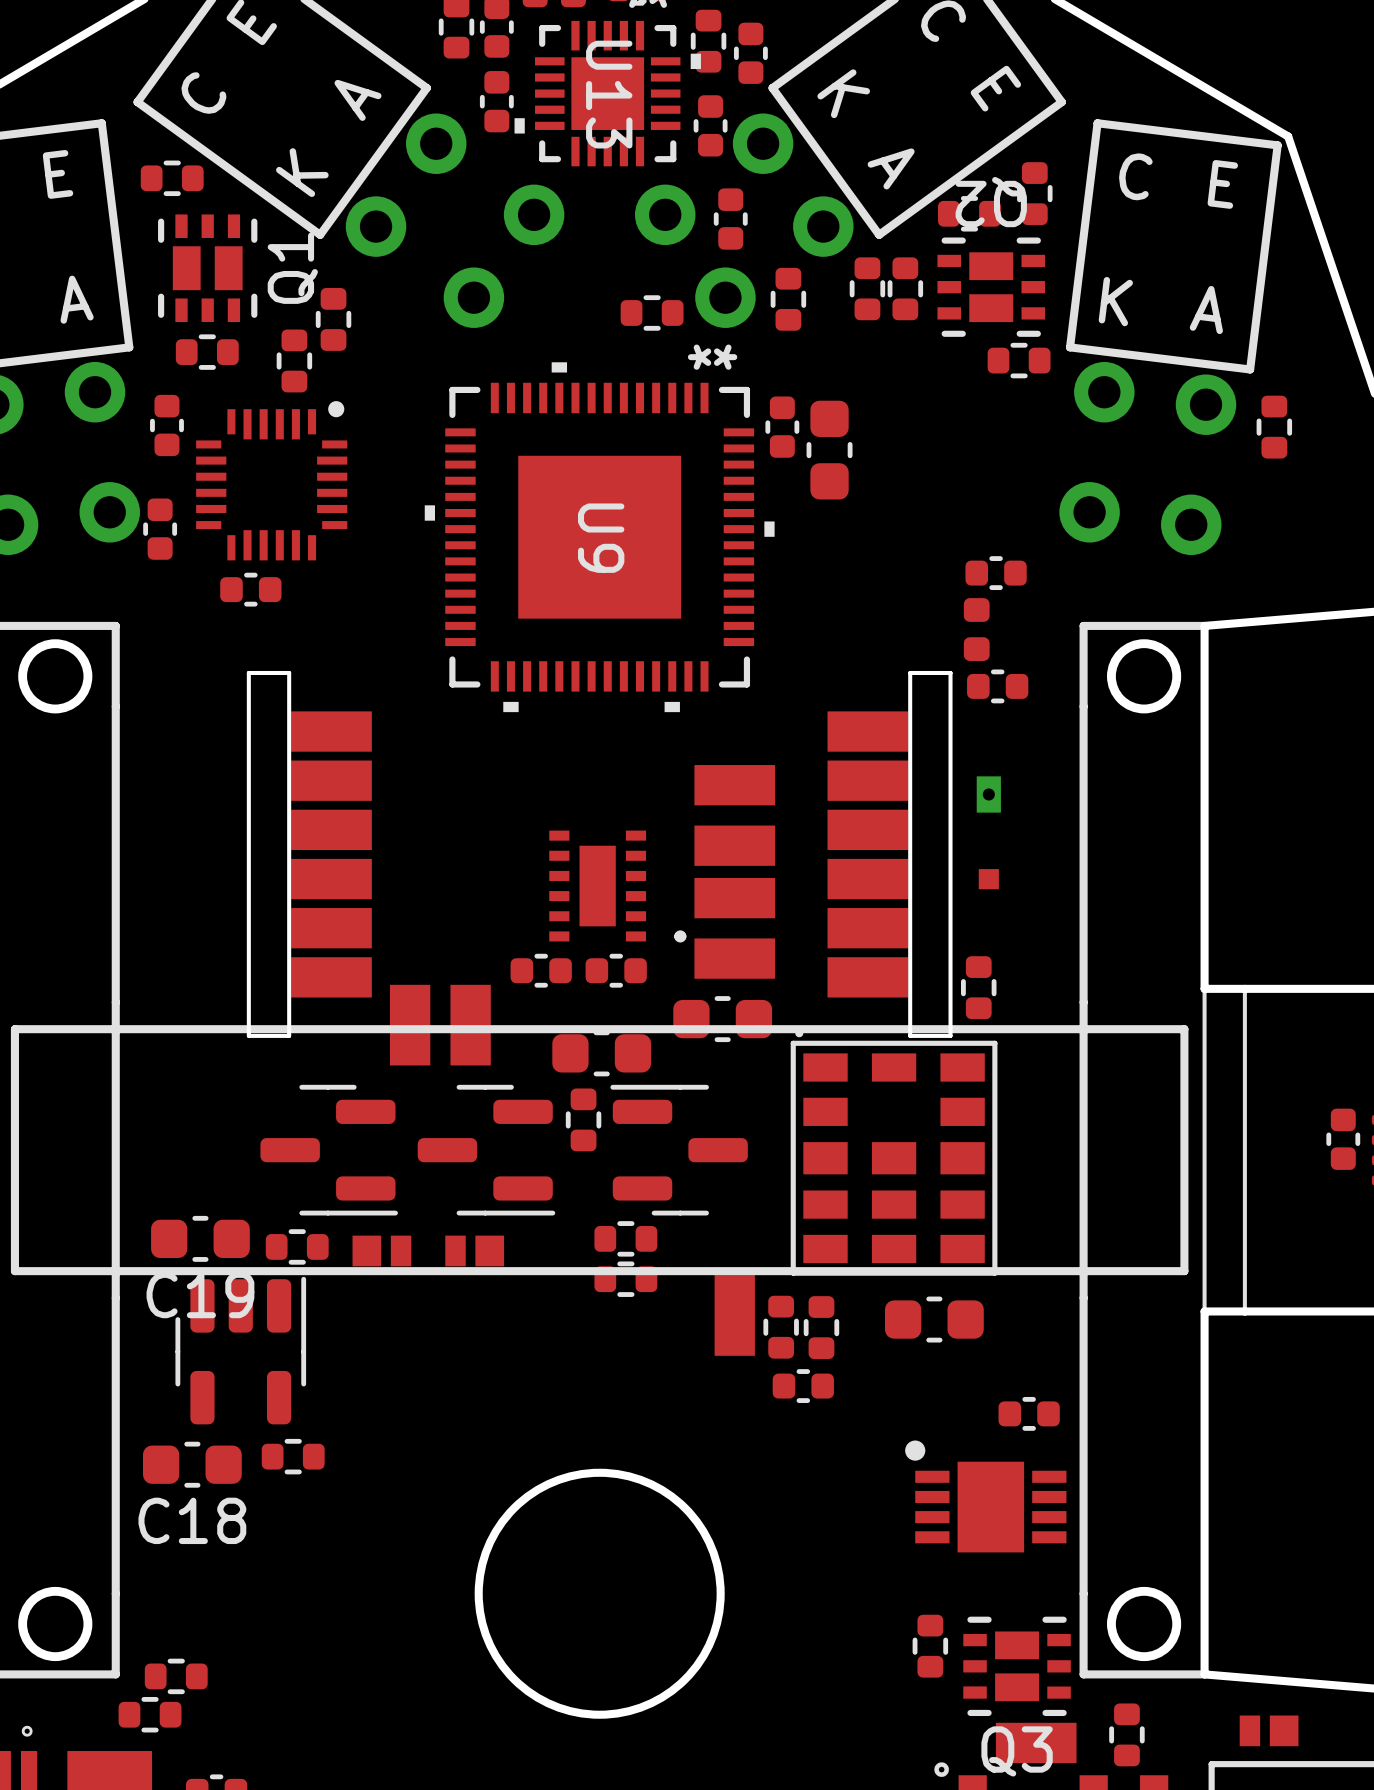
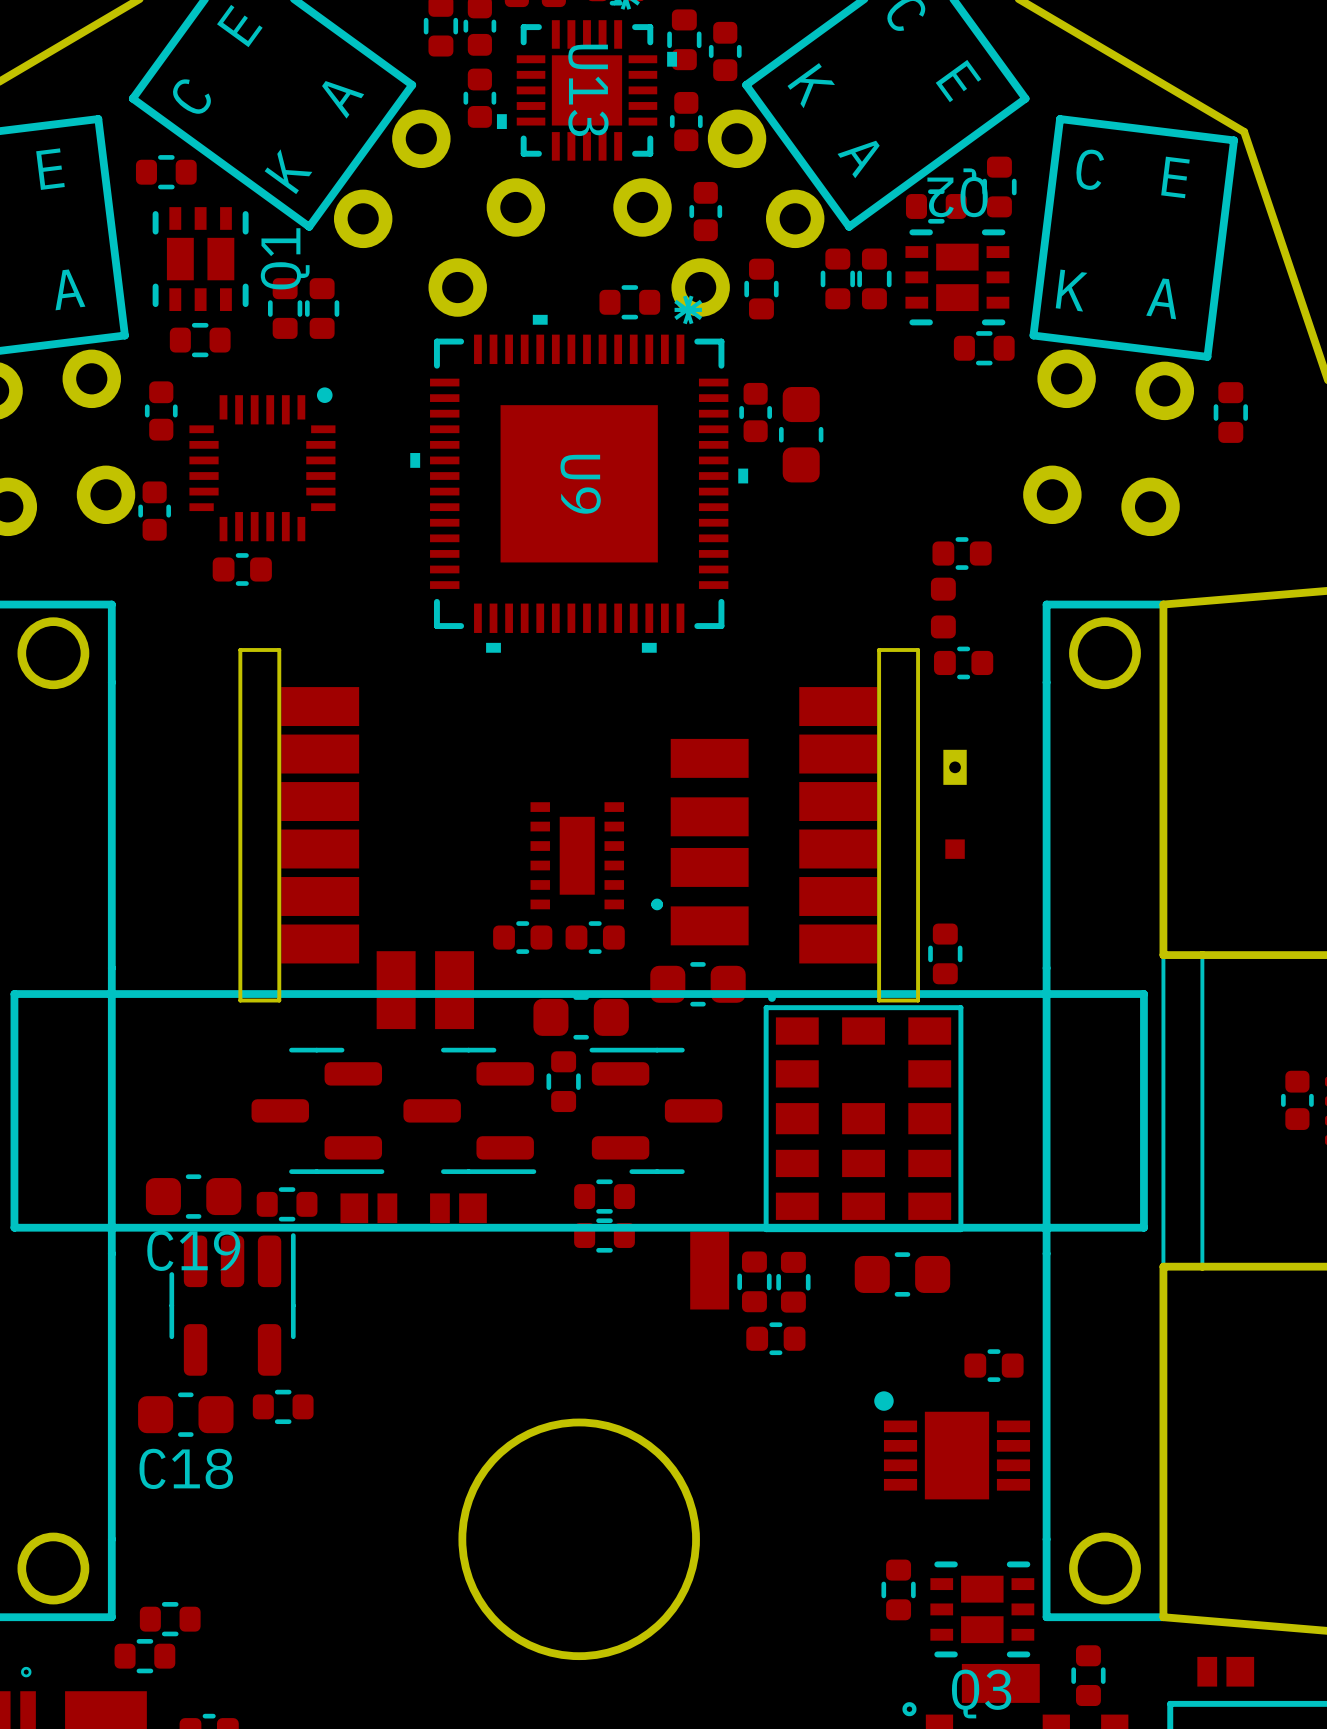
part position: (294, 360) -> (285, 308)
U9 position: (599, 537) -> (579, 483)

